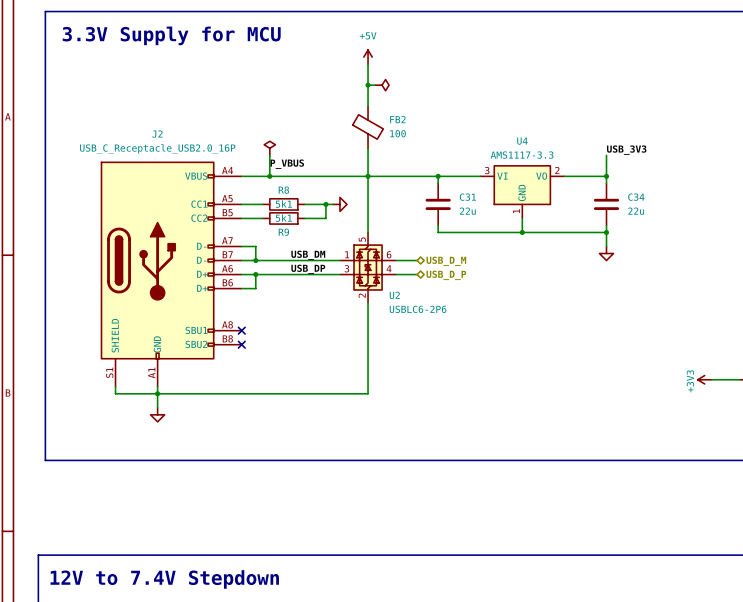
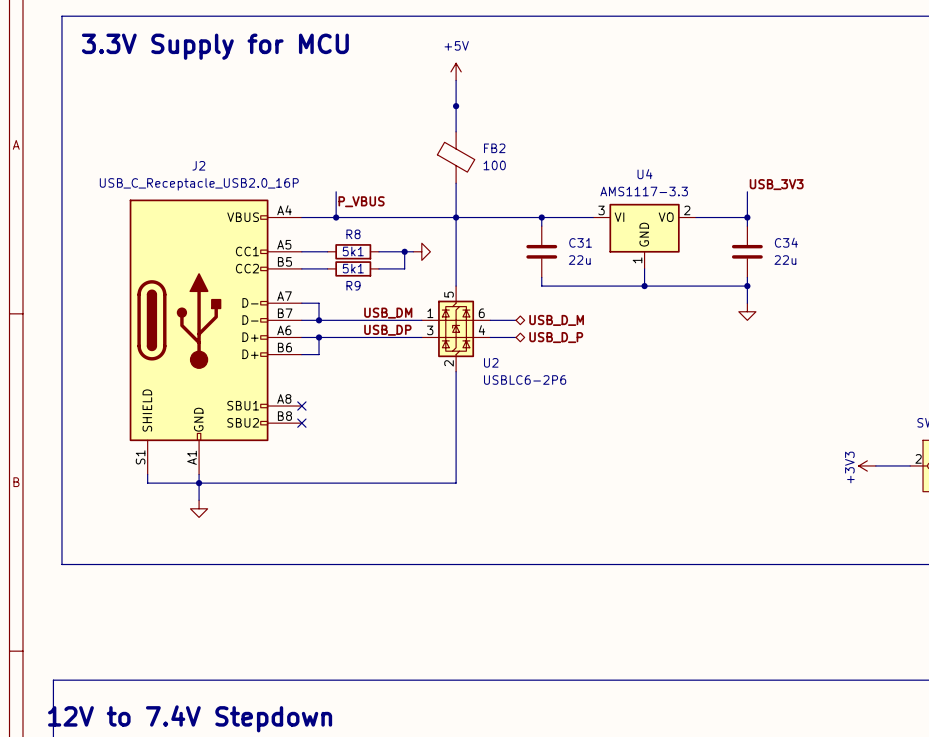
wire: (368, 85) (375, 85) -> none
power symbol: (382, 85) -> none
power symbol: (269, 148) -> none
text position: 12V to 7.4V Stepdown (164, 579) -> 12V to 7.4V Stepdown (190, 718)

